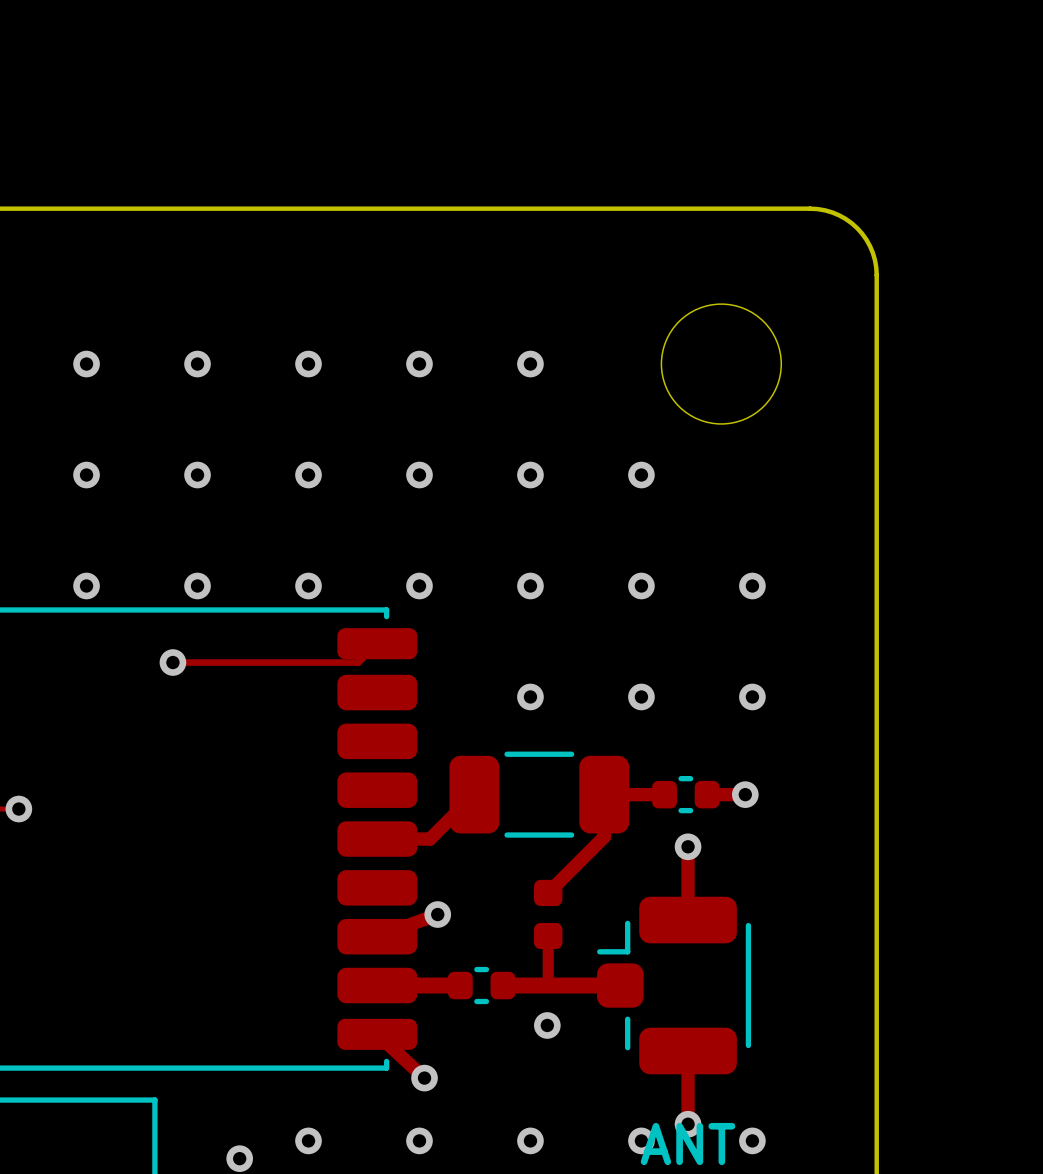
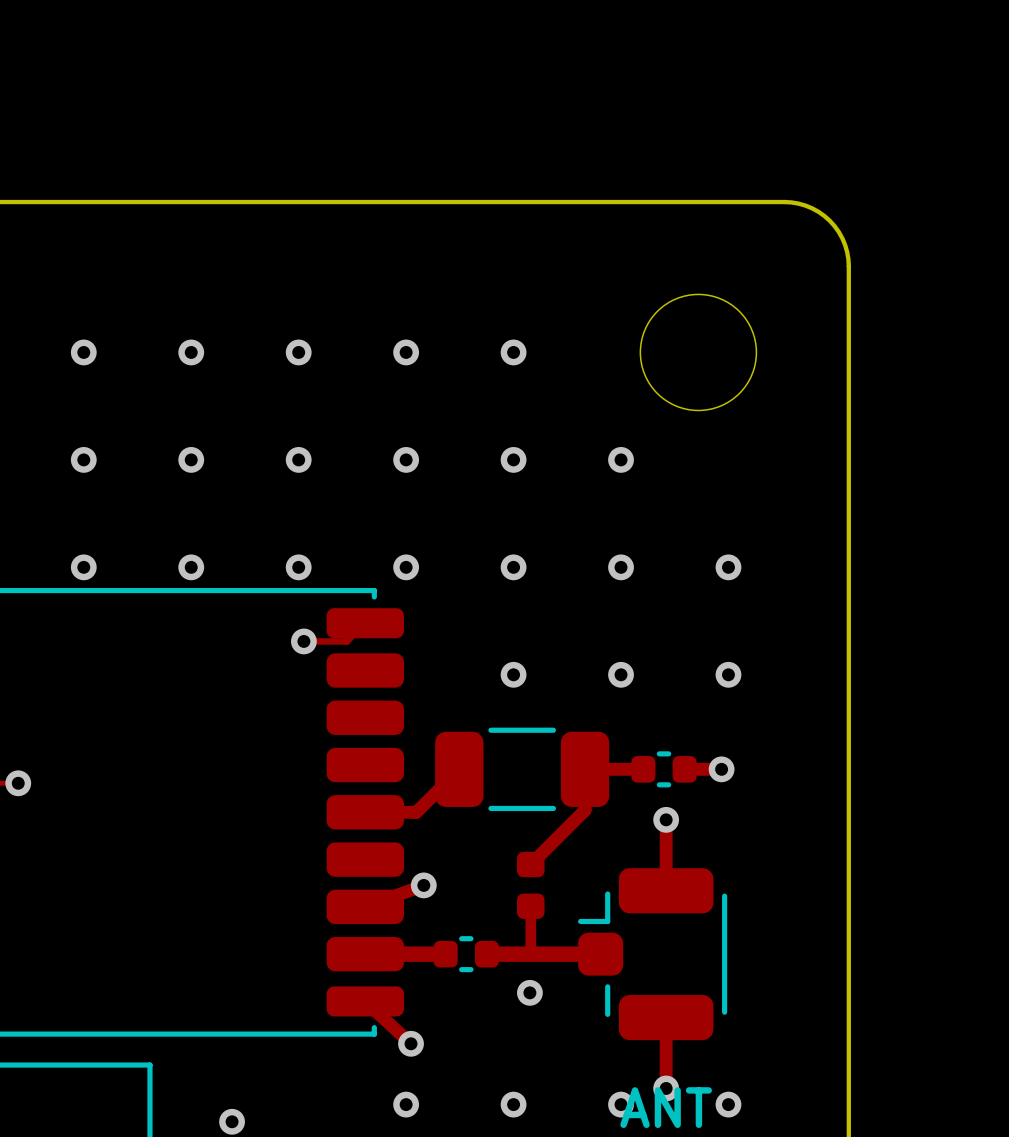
track: (172, 662) (313, 662) -> none
via position: (172, 662) -> (303, 641)
via: (308, 1140) -> none

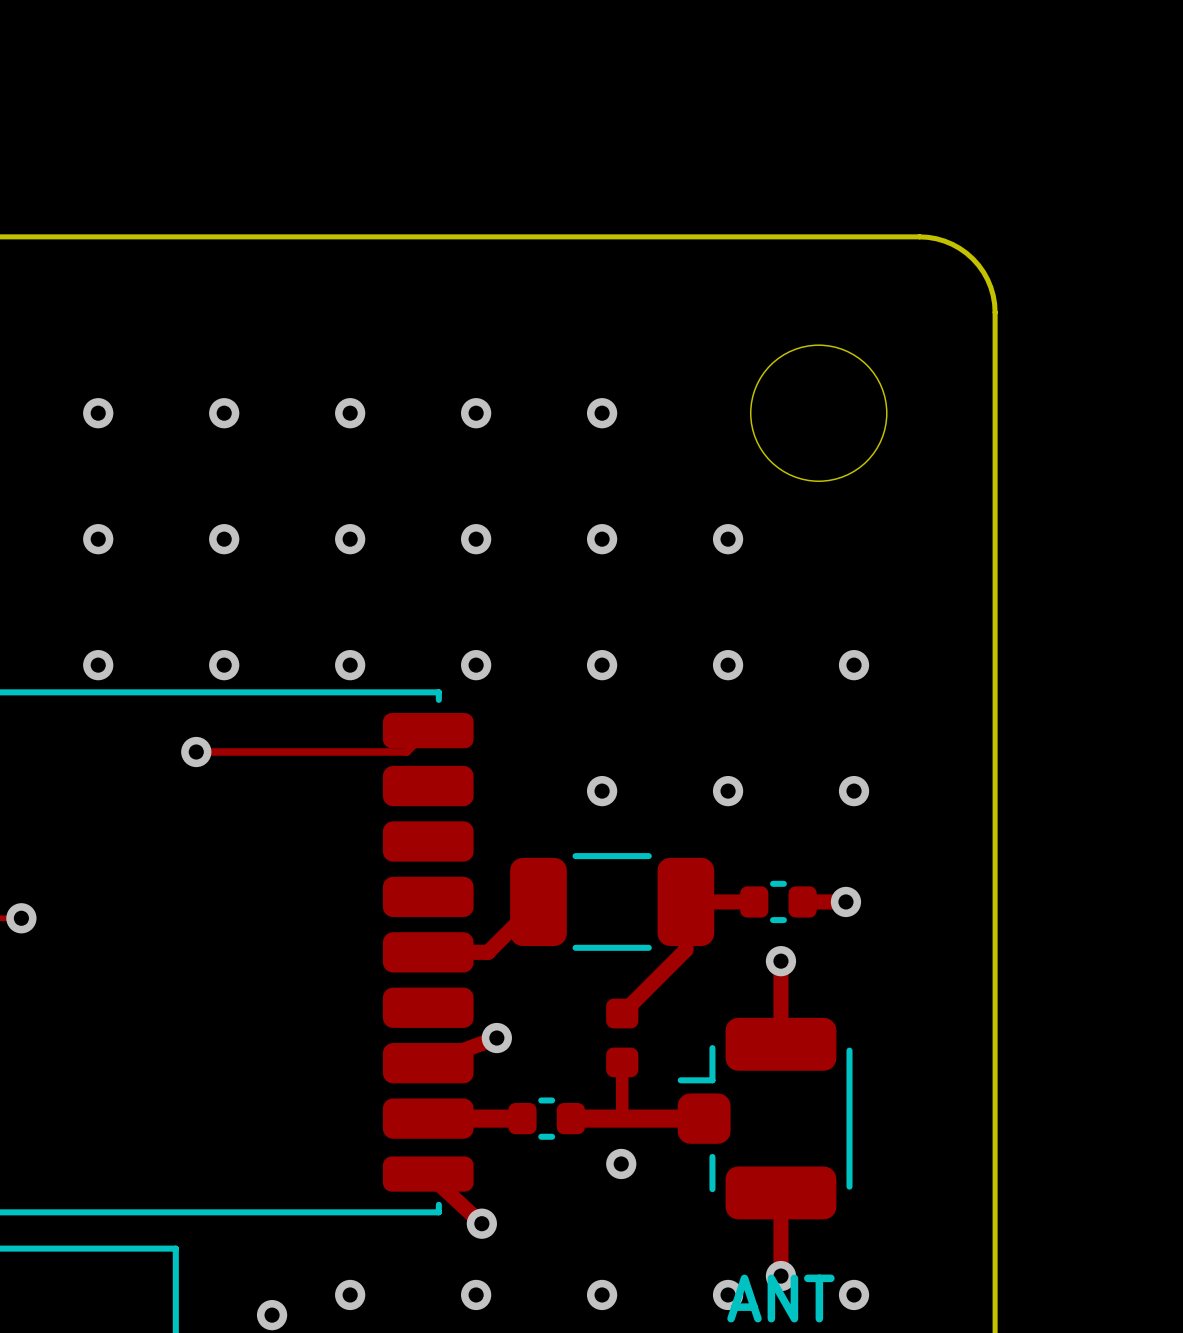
track: none -> (196, 752) (356, 752)
via position: (303, 641) -> (196, 752)
via: none -> (350, 1294)

